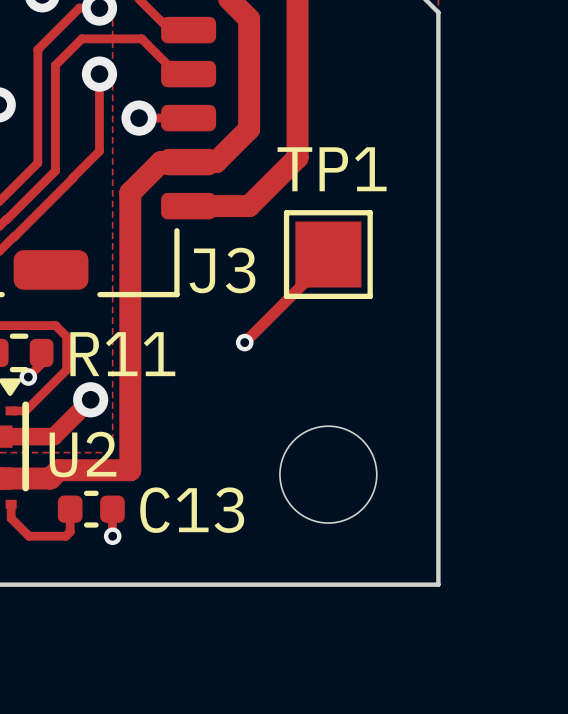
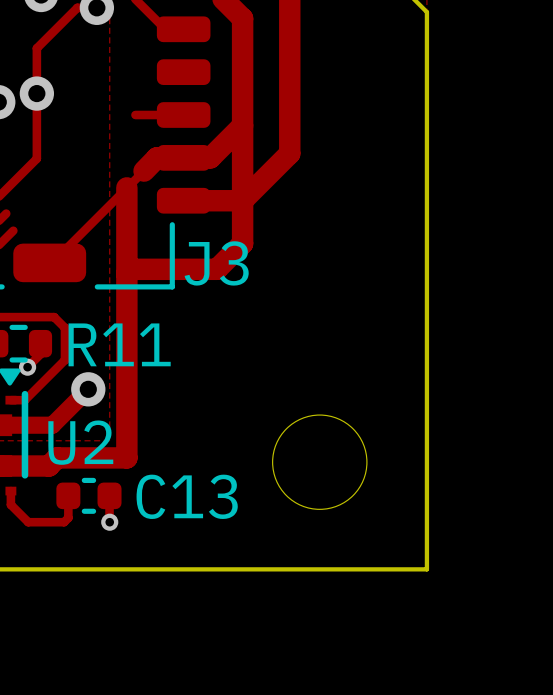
track: (99, 74) (99, 151) (73, 177) -> none
via: (99, 74) -> none
track: (188, 74) (176, 74) (141, 38) (81, 38) (55, 65) (55, 170) (7, 219) -> none
via: none -> (36, 93)
via: (139, 118) -> none
track: none -> (242, 125) (242, 243) (216, 269) (131, 269) (126, 273)
track width: thick (161, 162) (130, 192) -> thin (156, 157) (126, 187)
track: (73, 178) (14, 236) -> none
track: (328, 254) (328, 258) (244, 342) -> none
TP1: (328, 254) -> none
via: (244, 342) -> none

